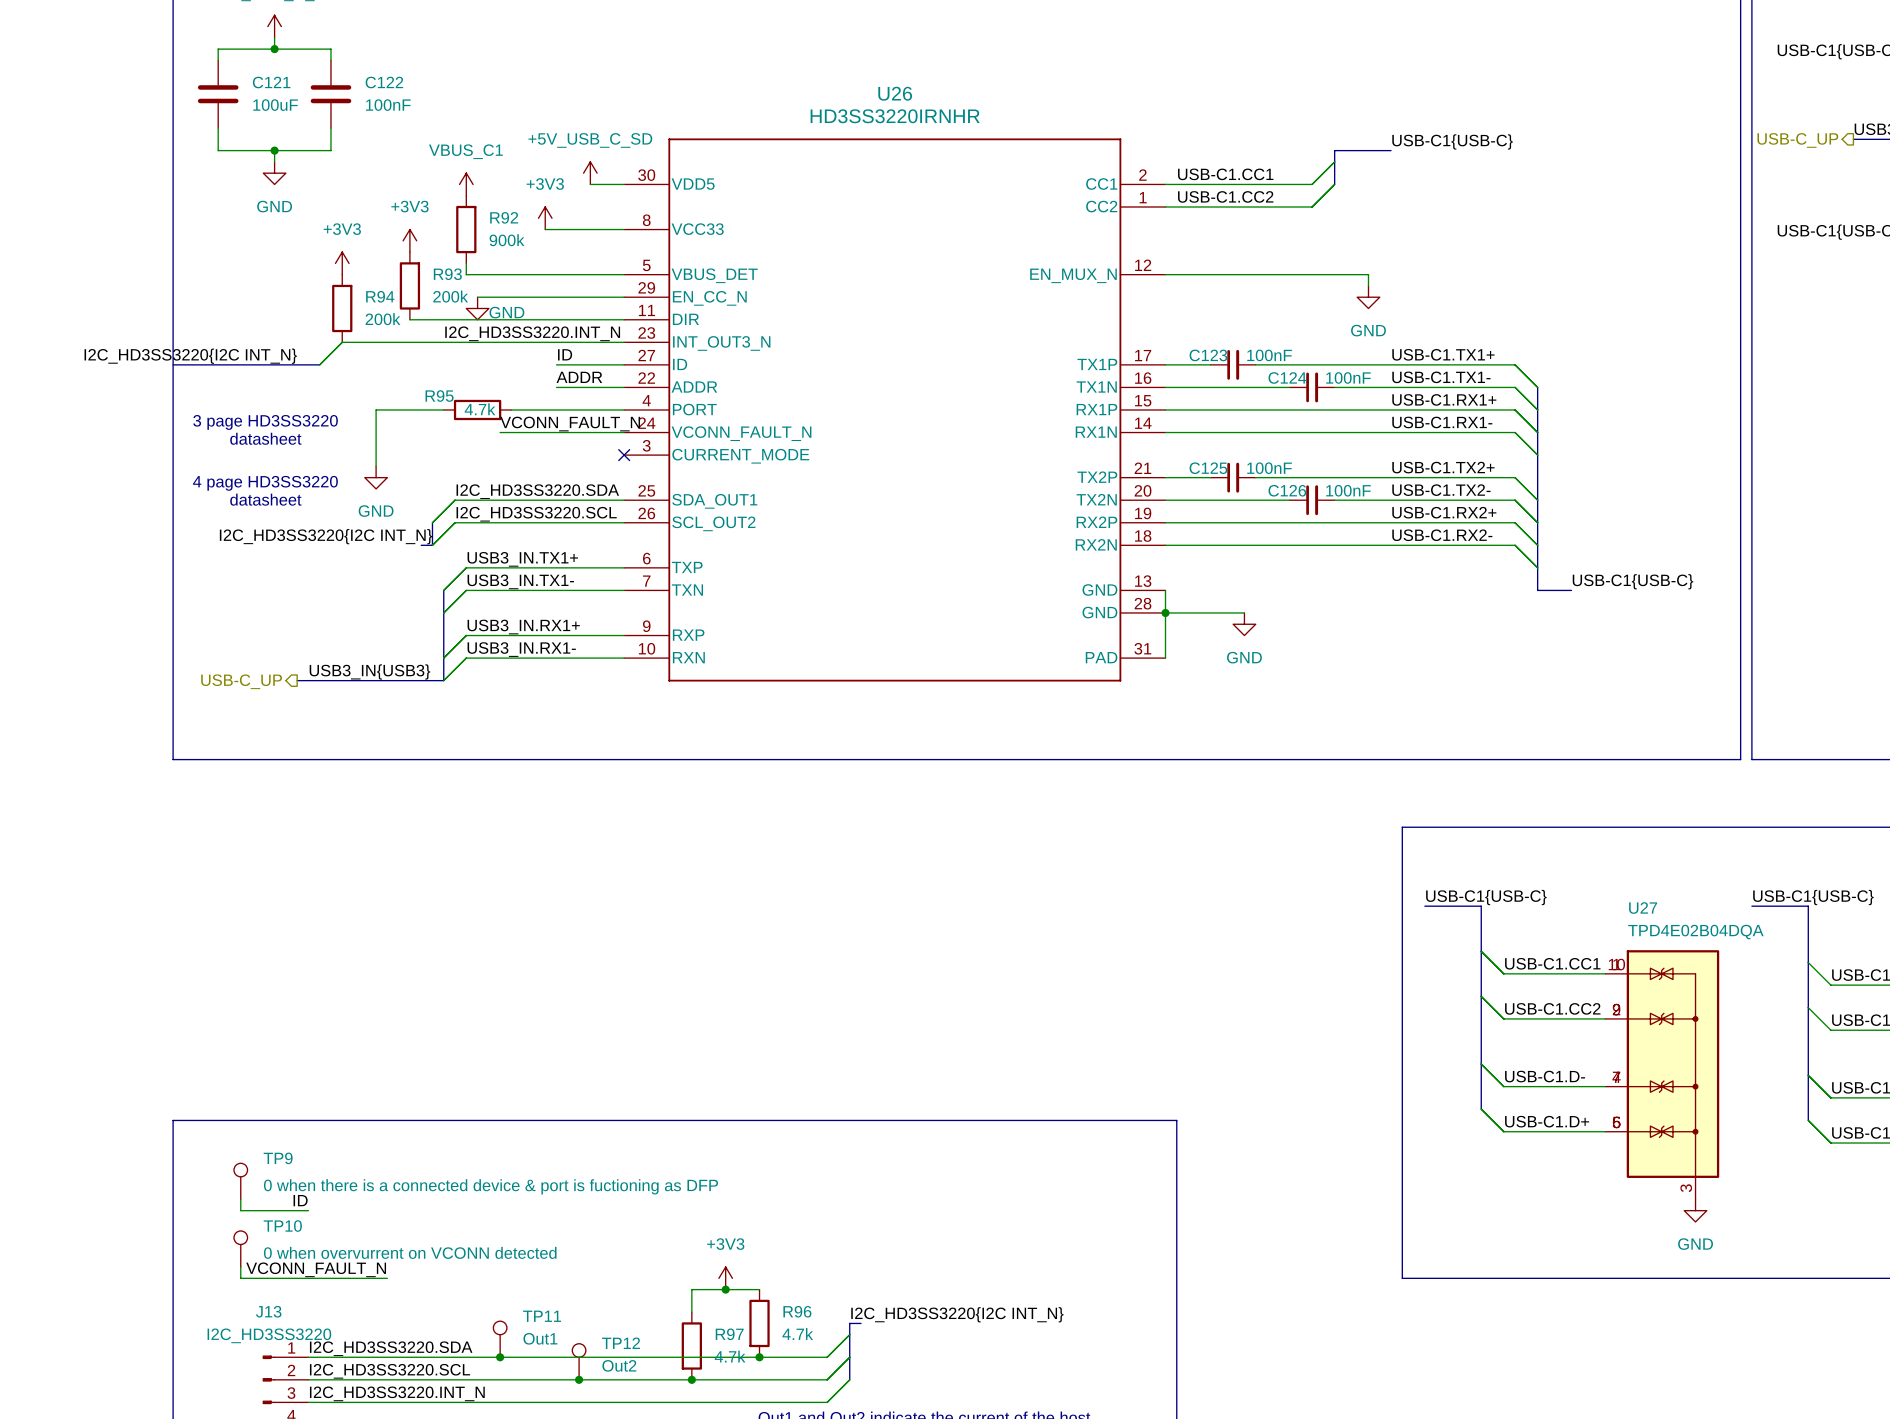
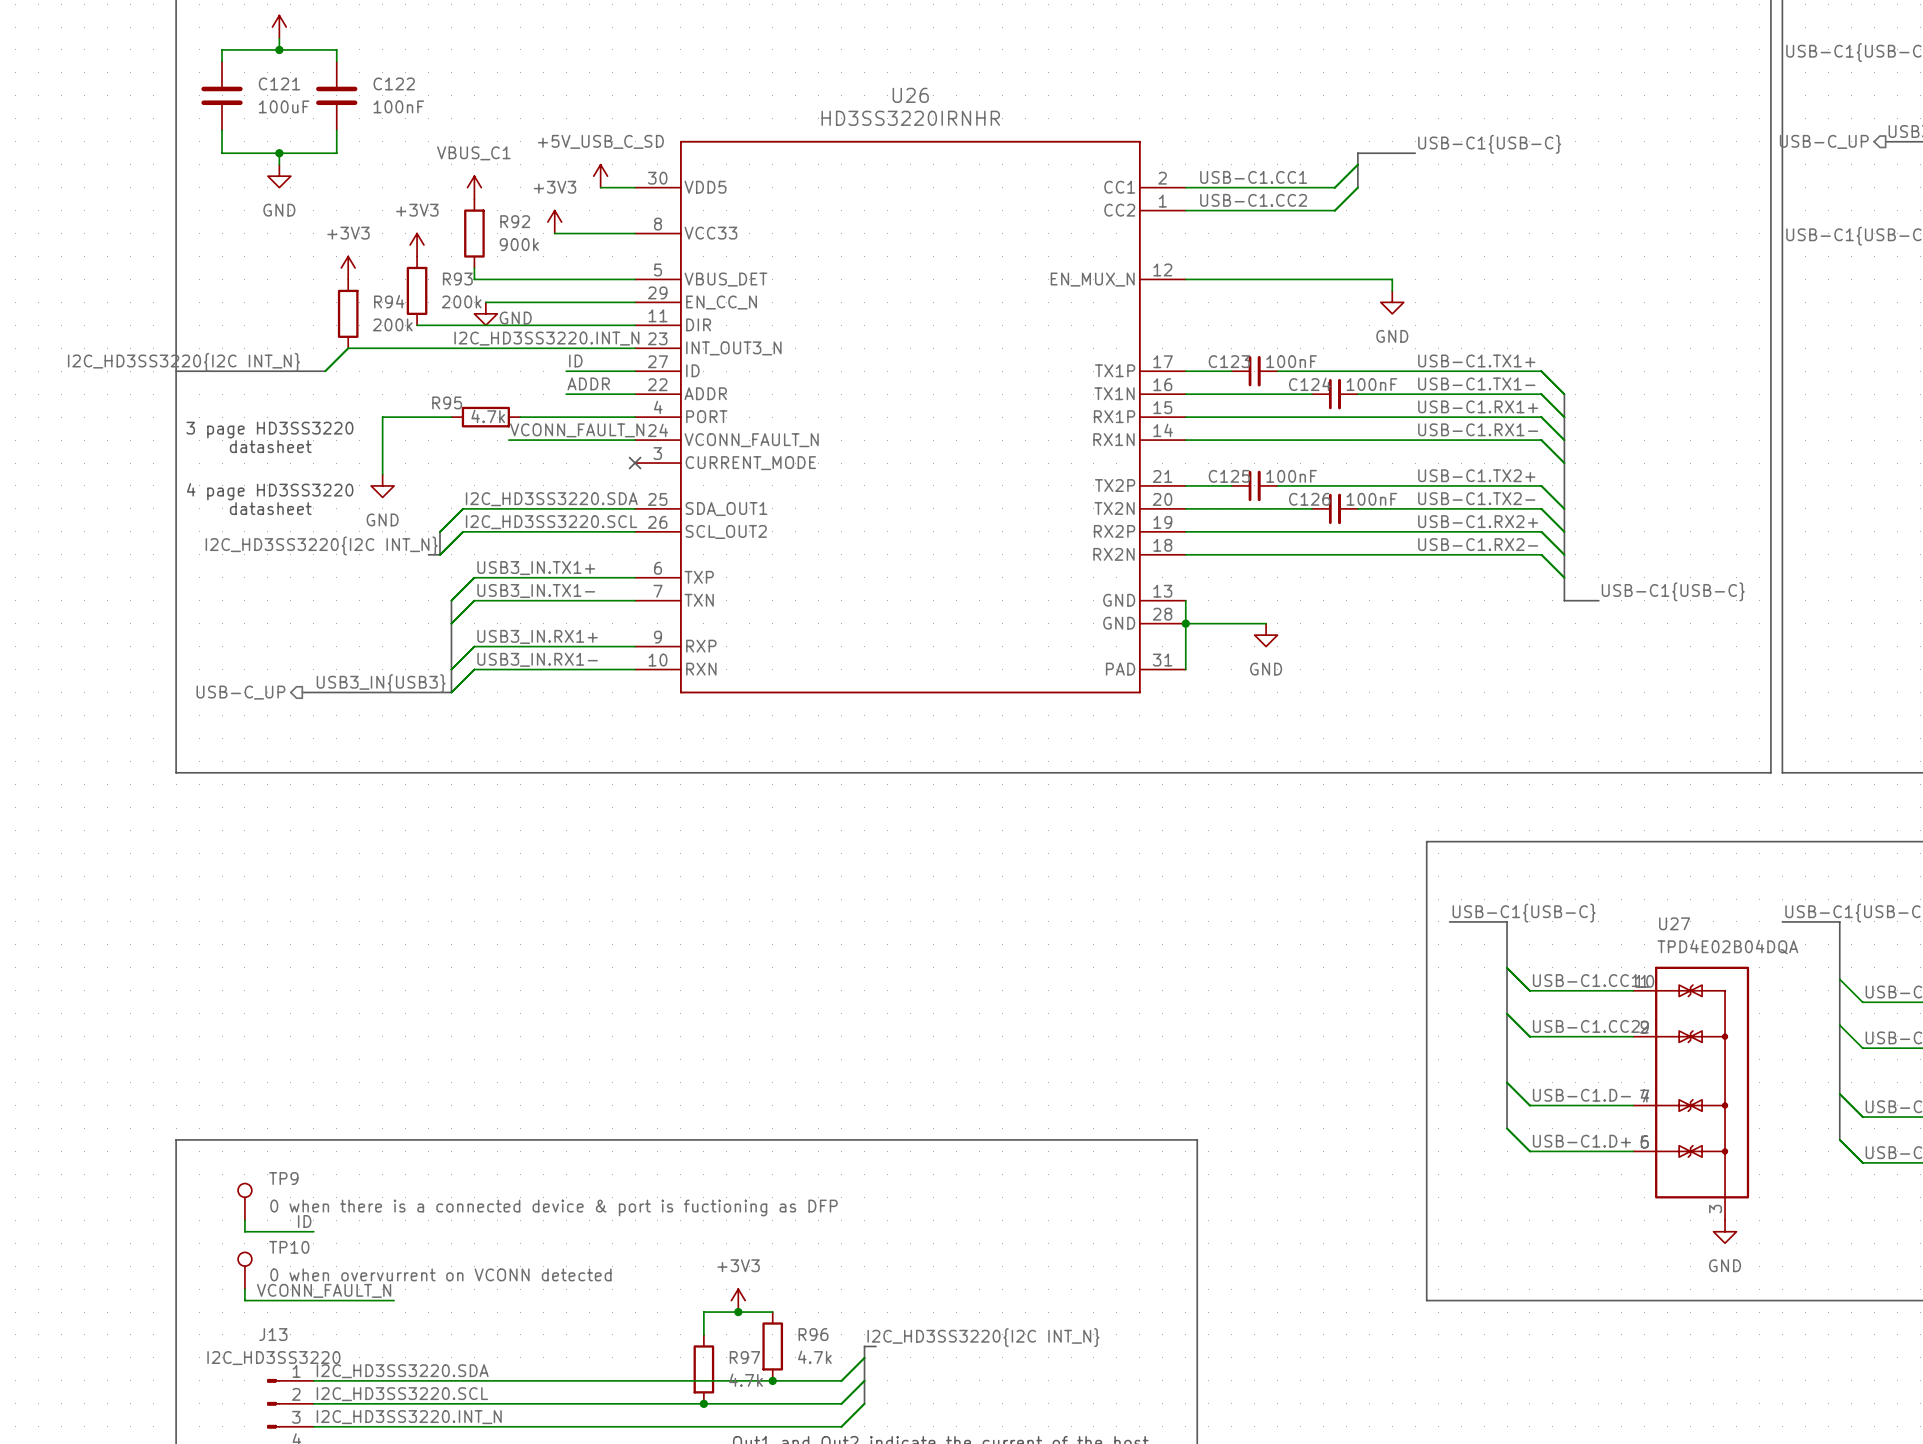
TP11: Out1 (500, 1339) -> none
junction: (500, 1357) -> none
TP12: Out2 (579, 1361) -> none
junction: (579, 1379) -> none

